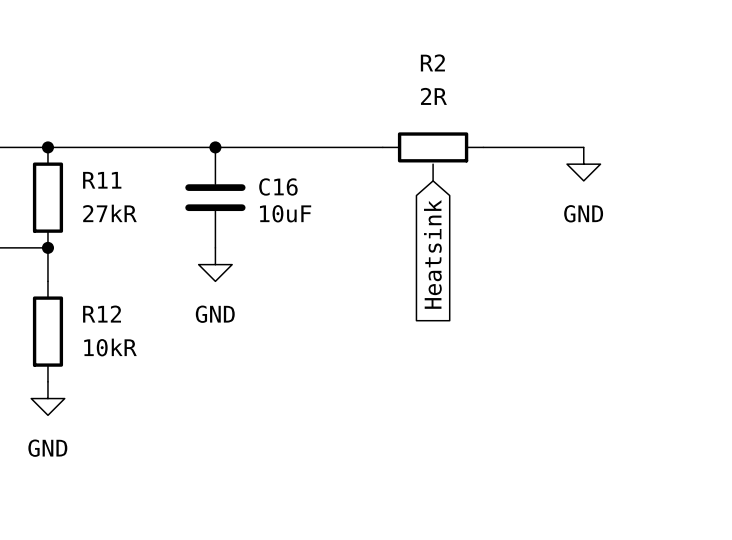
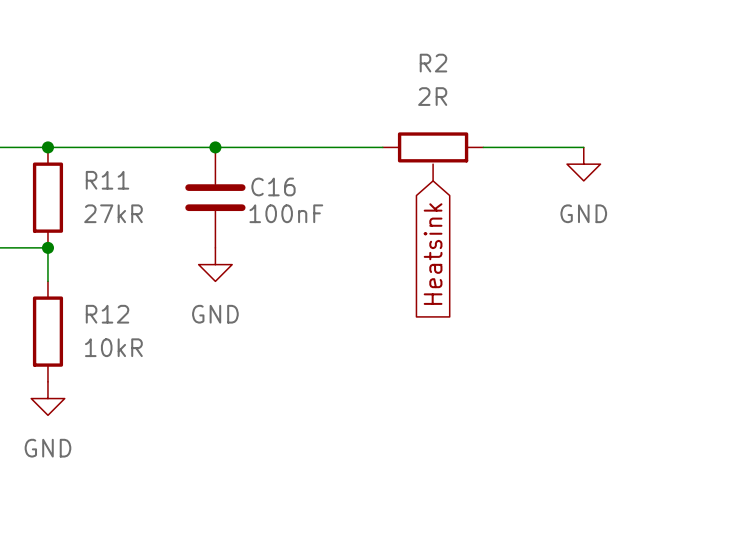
C16 value: 10uF (285, 213) -> 100nF (286, 213)

